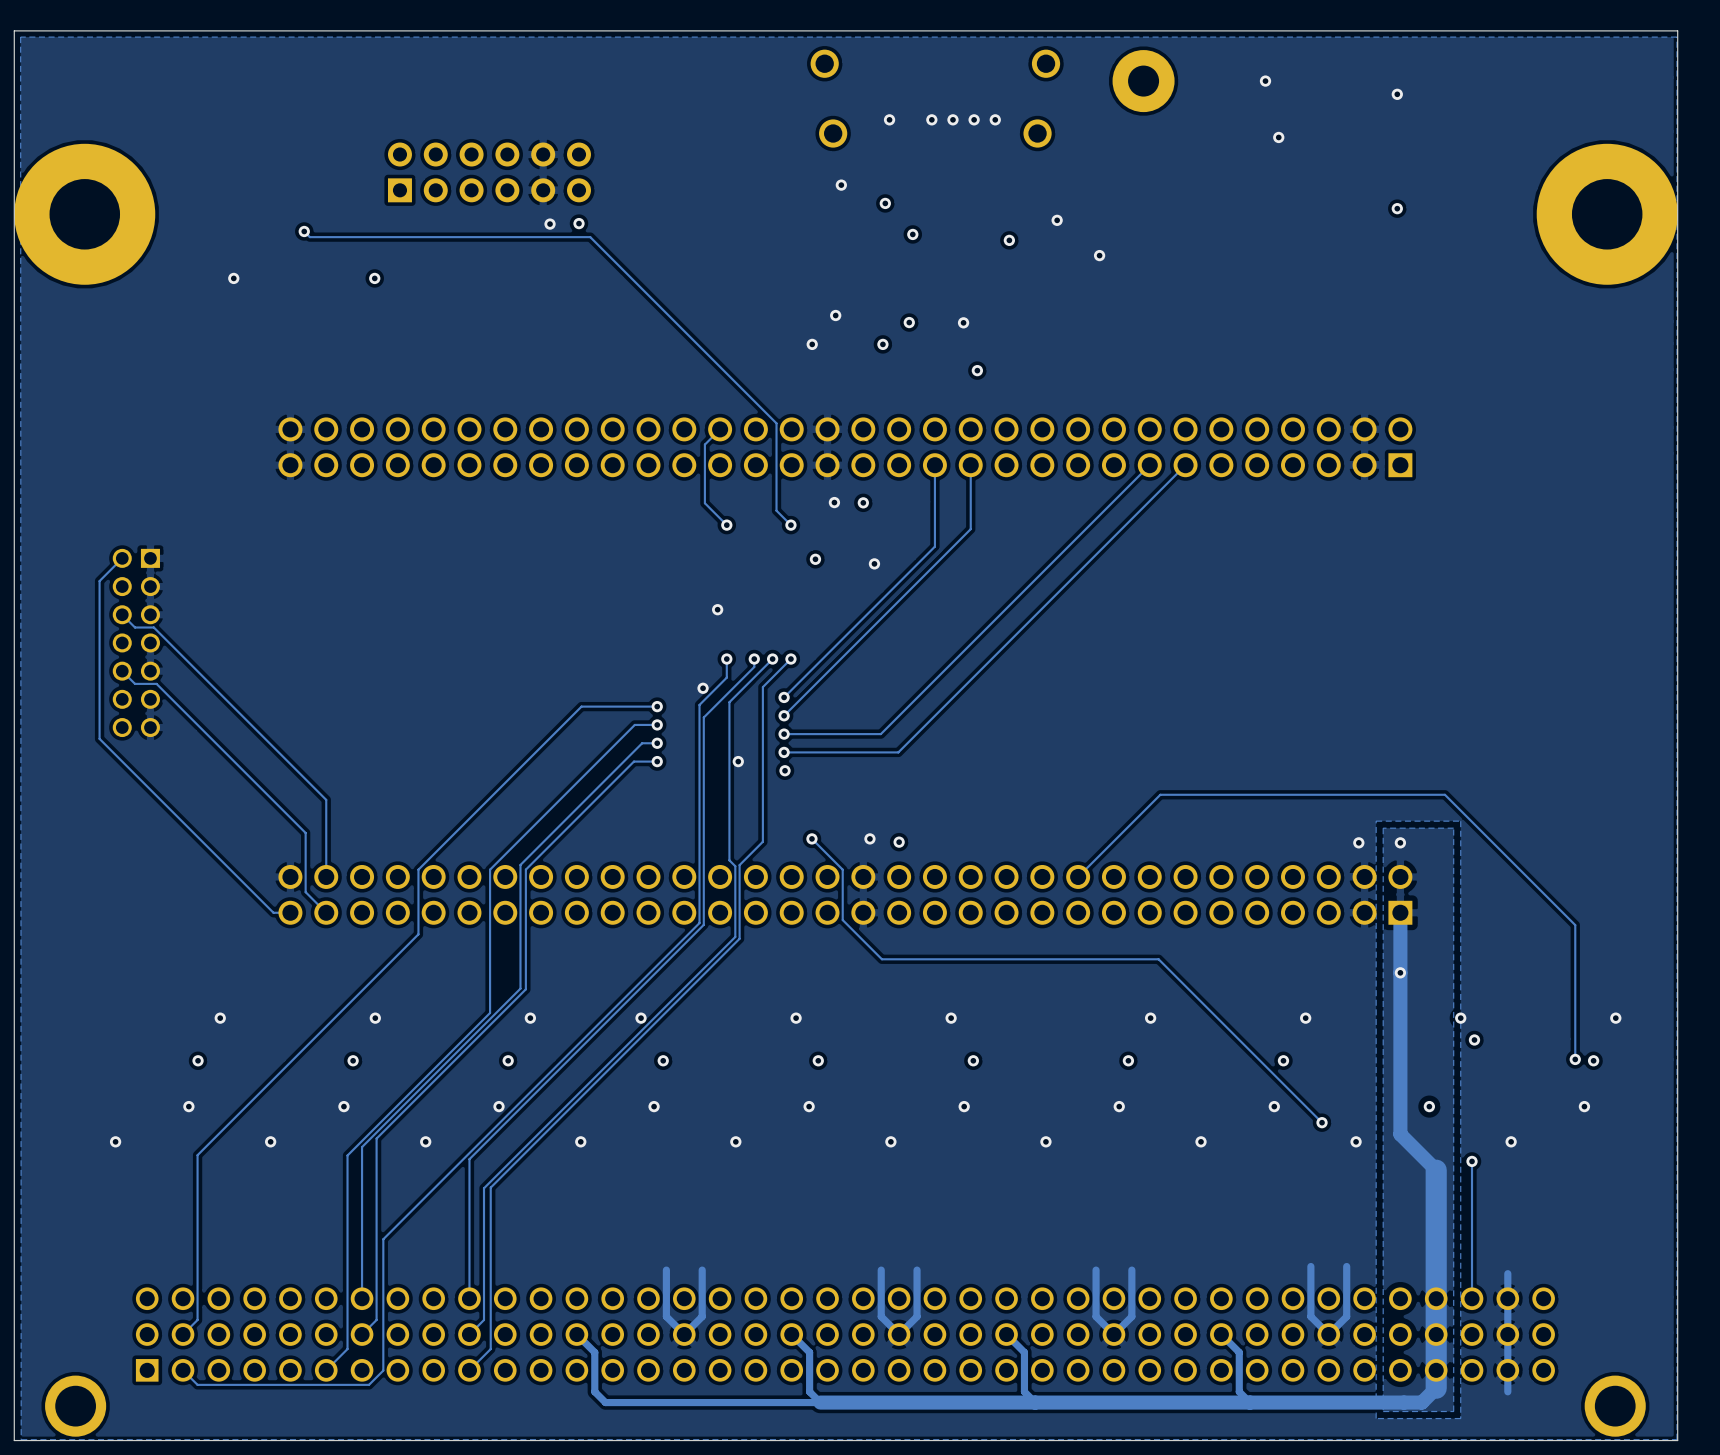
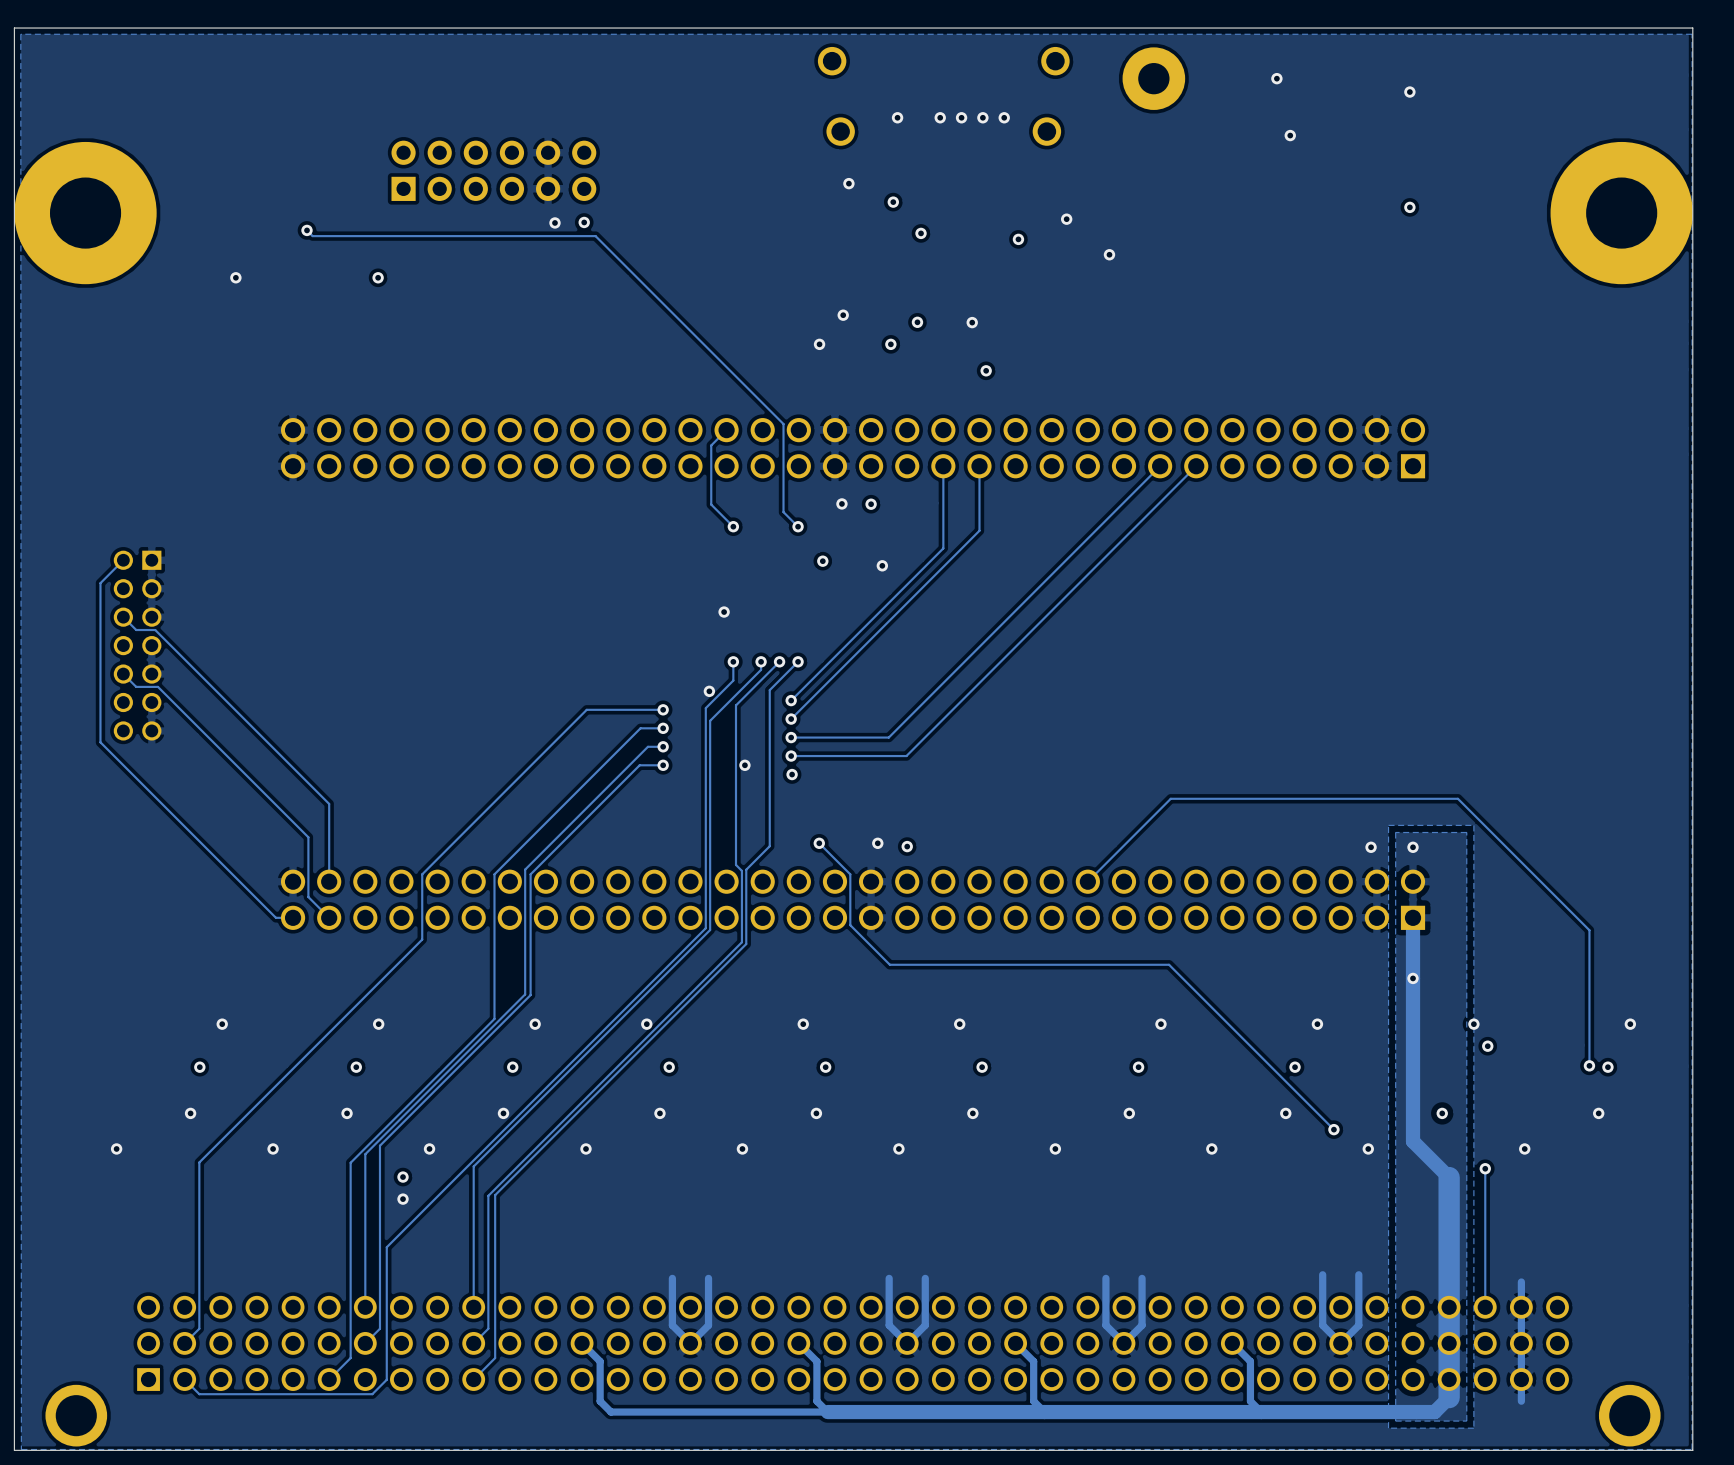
via: none -> (403, 1177)
via: none -> (403, 1199)

